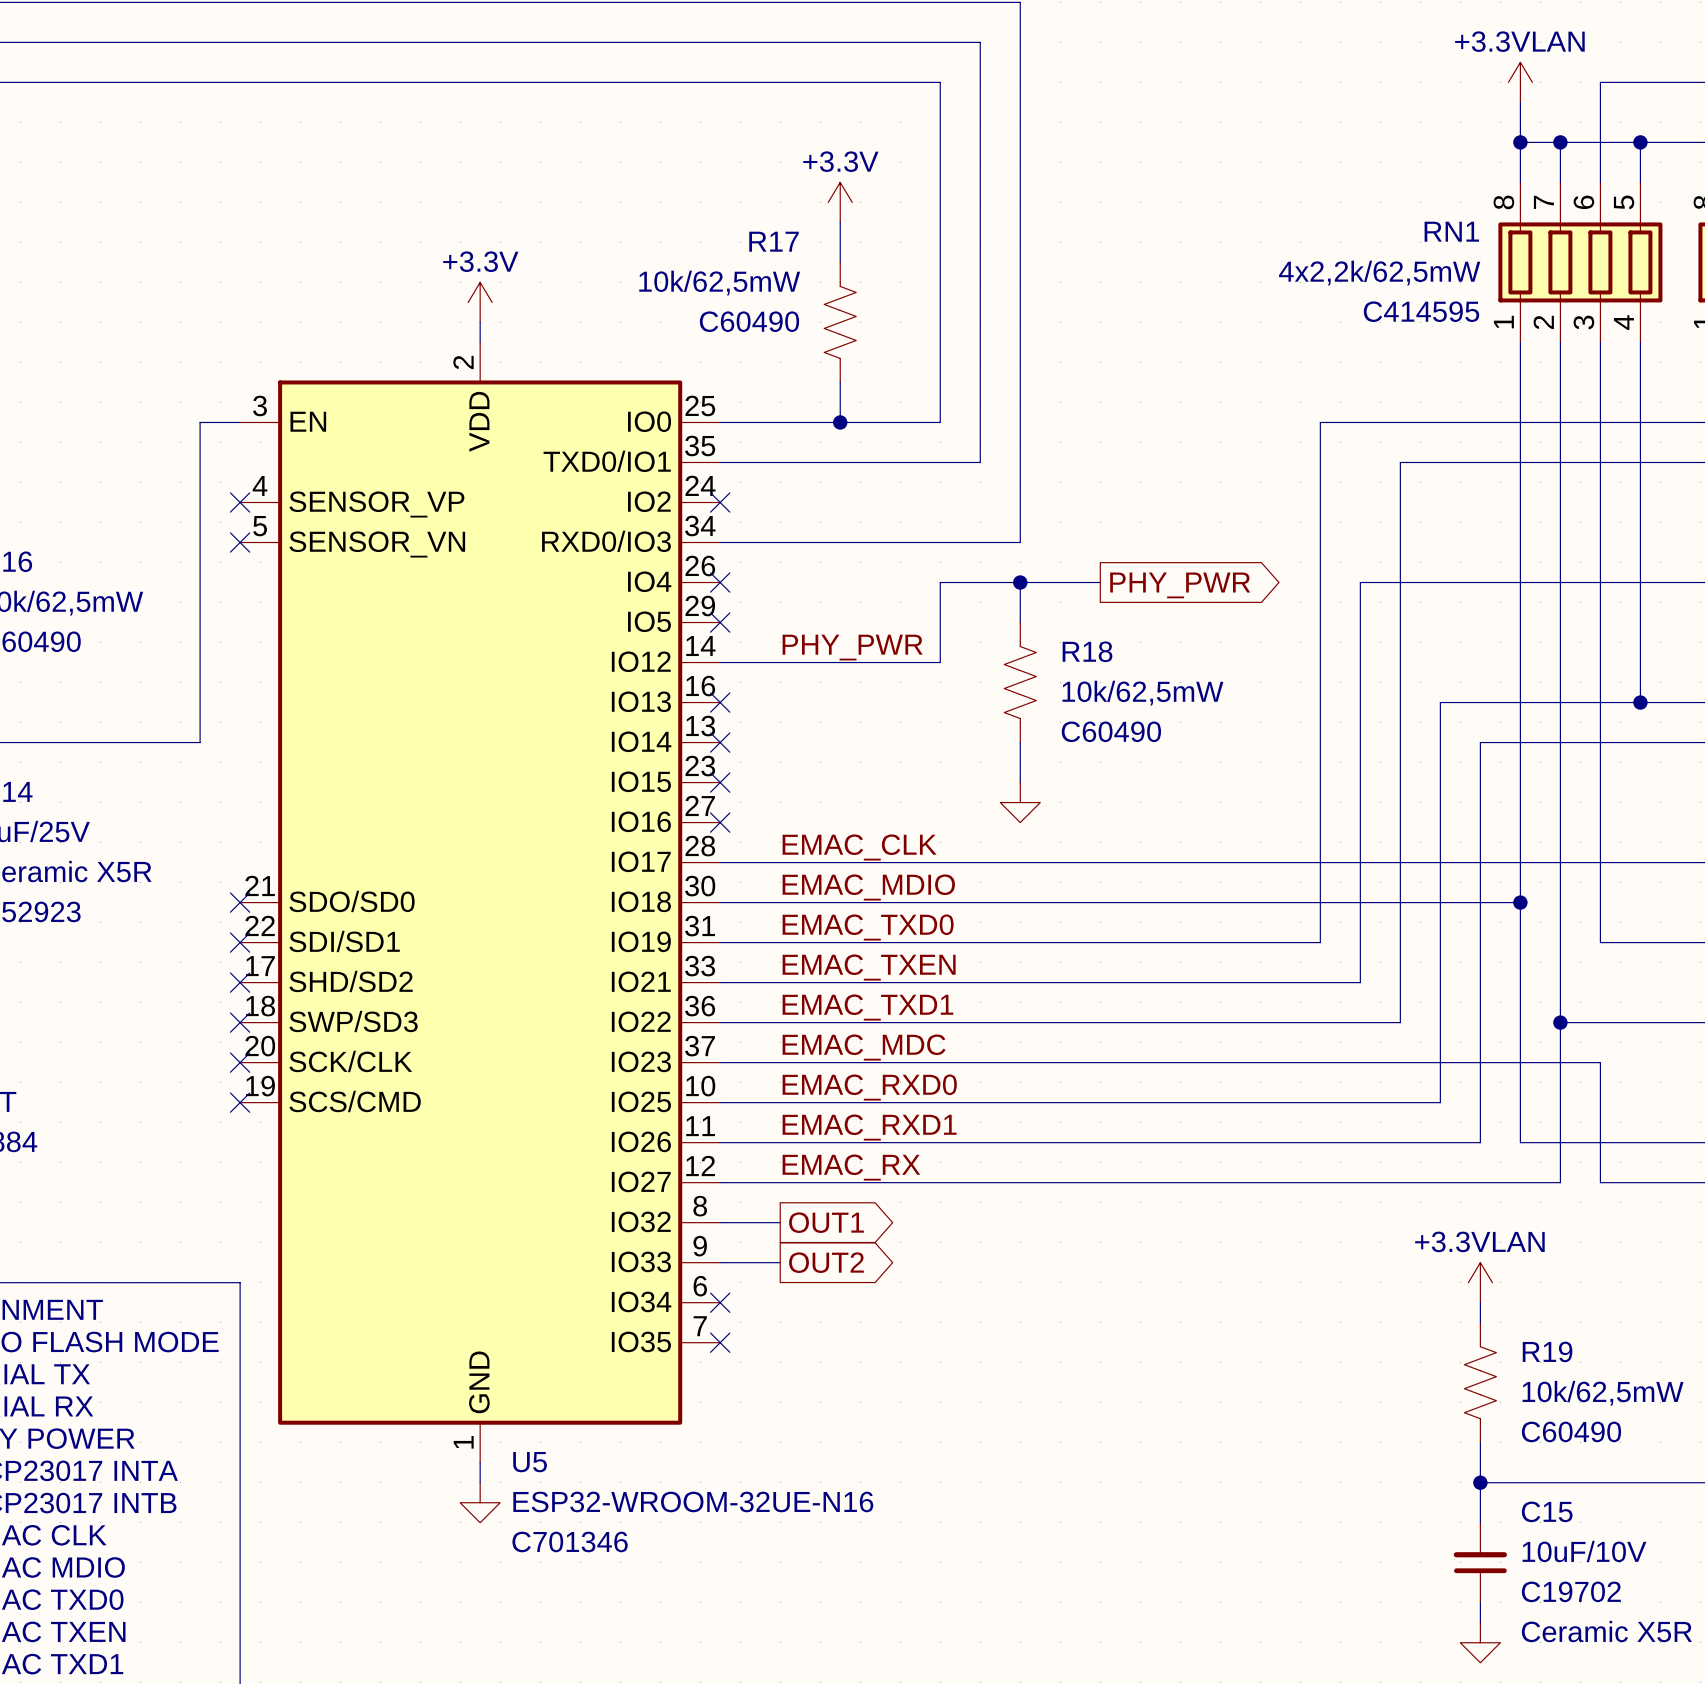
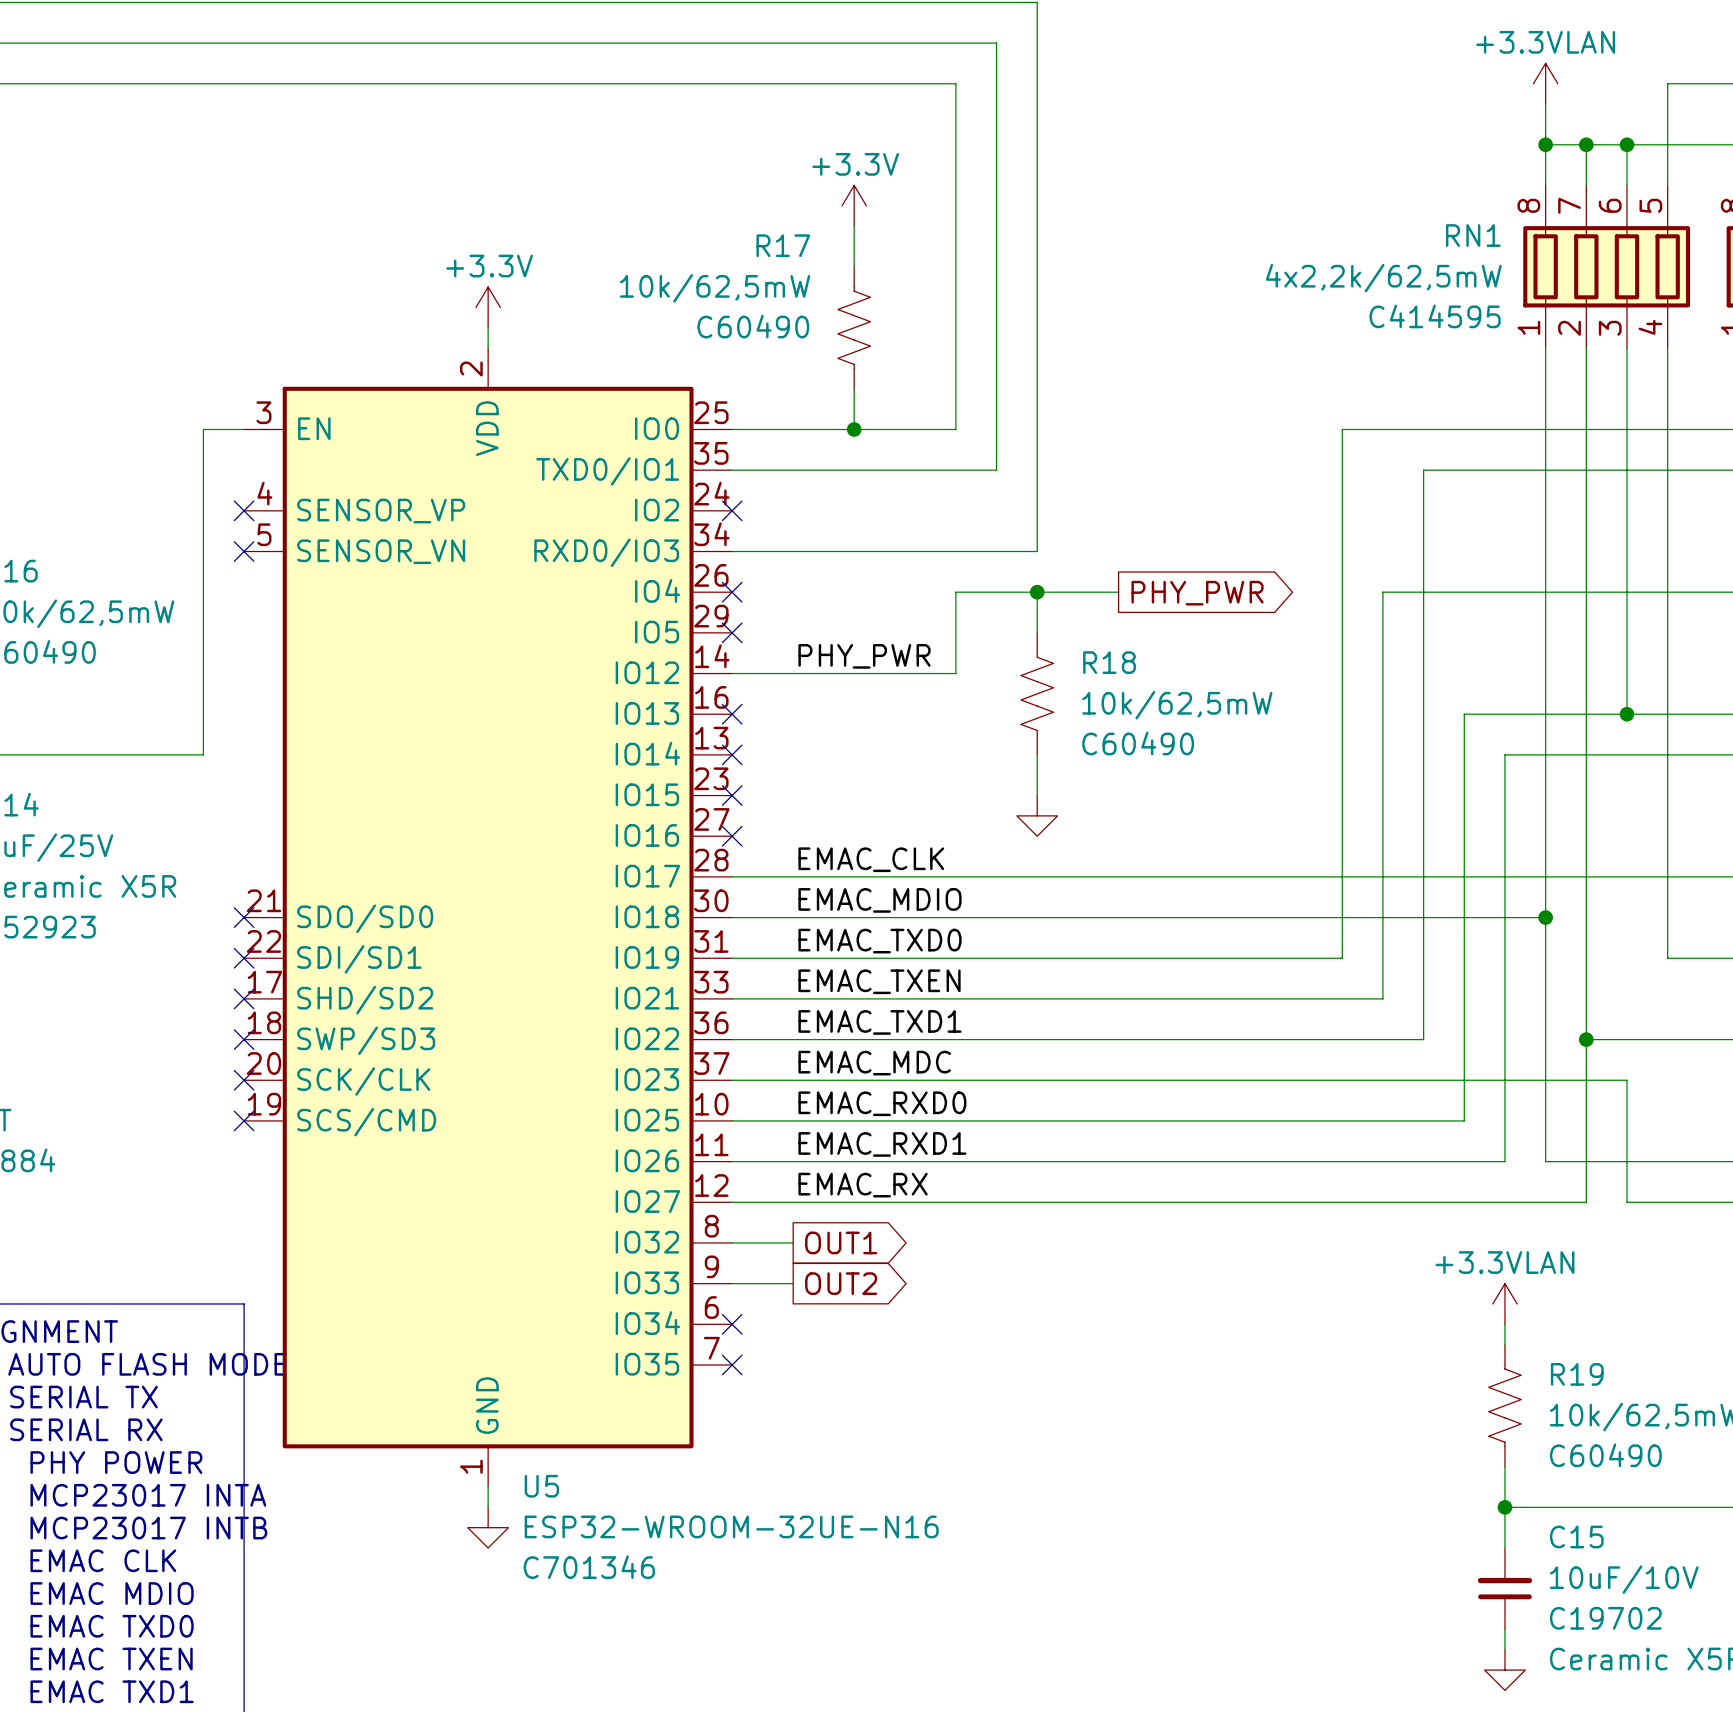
wire: (1640, 82) (1600, 82) (1600, 142) -> (1667, 83) (1667, 144)
junction position: (1640, 142) -> (1626, 144)
wire: (1600, 702) (1600, 942) (1640, 942) -> (1667, 714) (1667, 958)
junction position: (1640, 702) -> (1626, 714)

